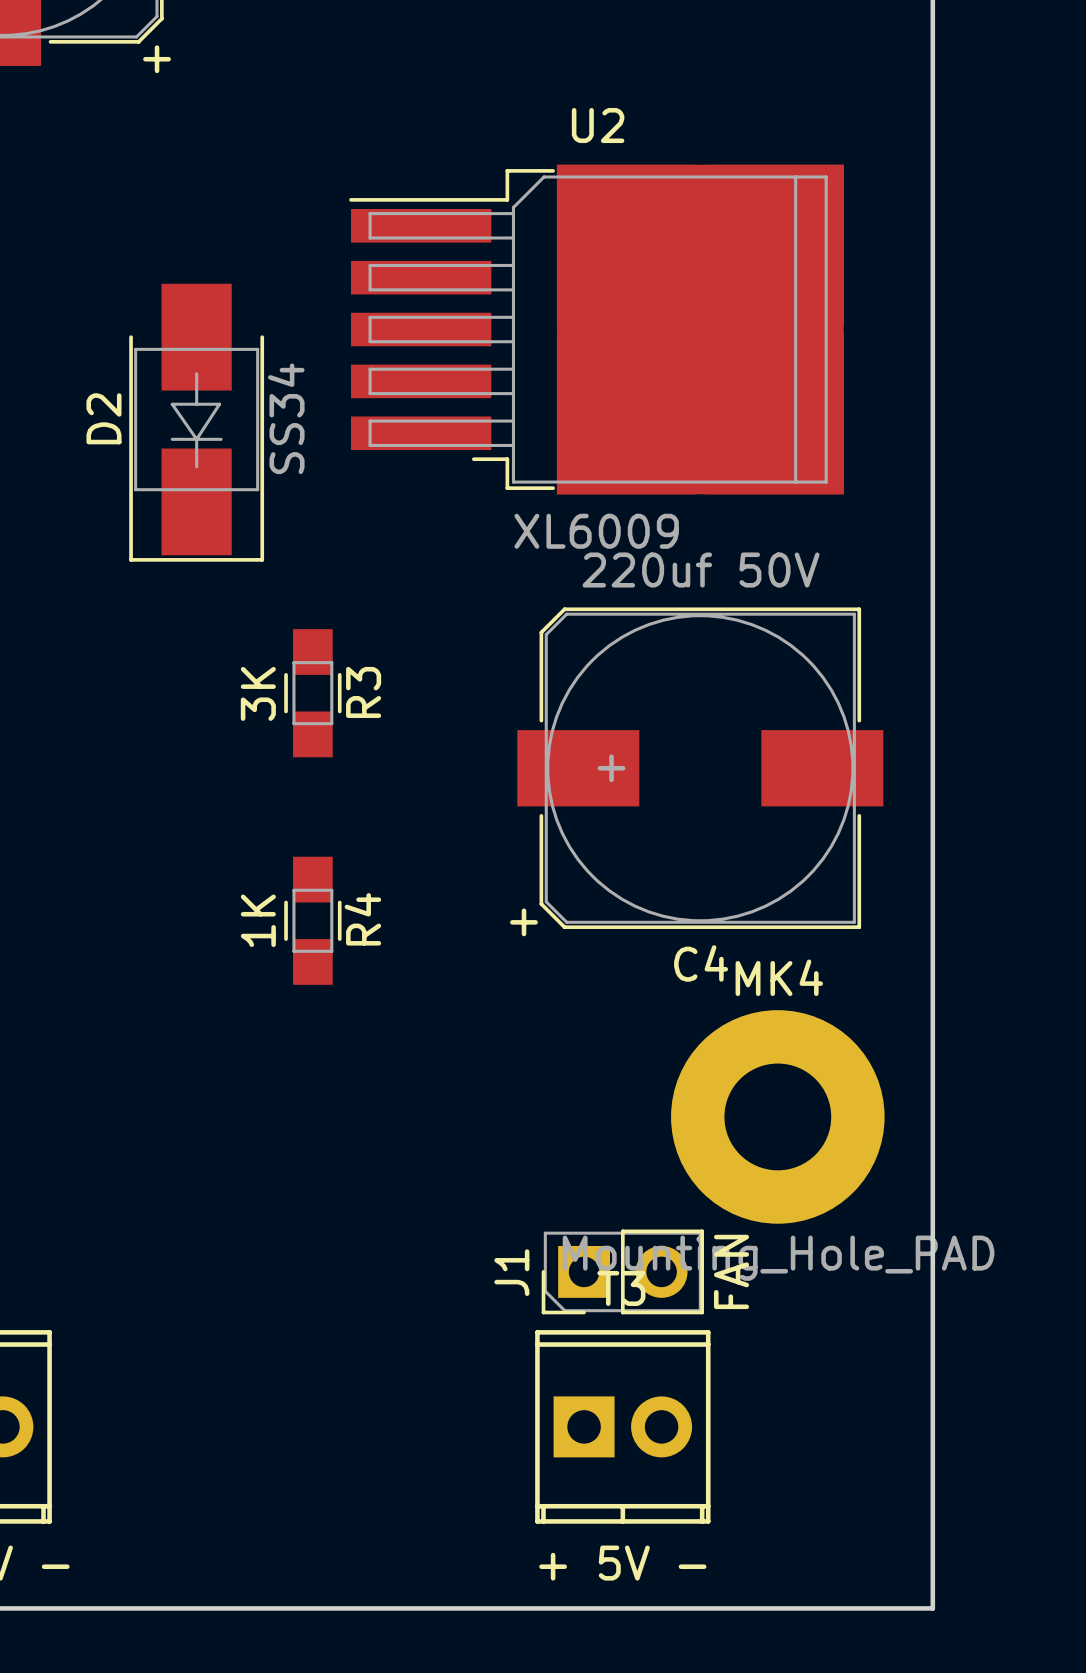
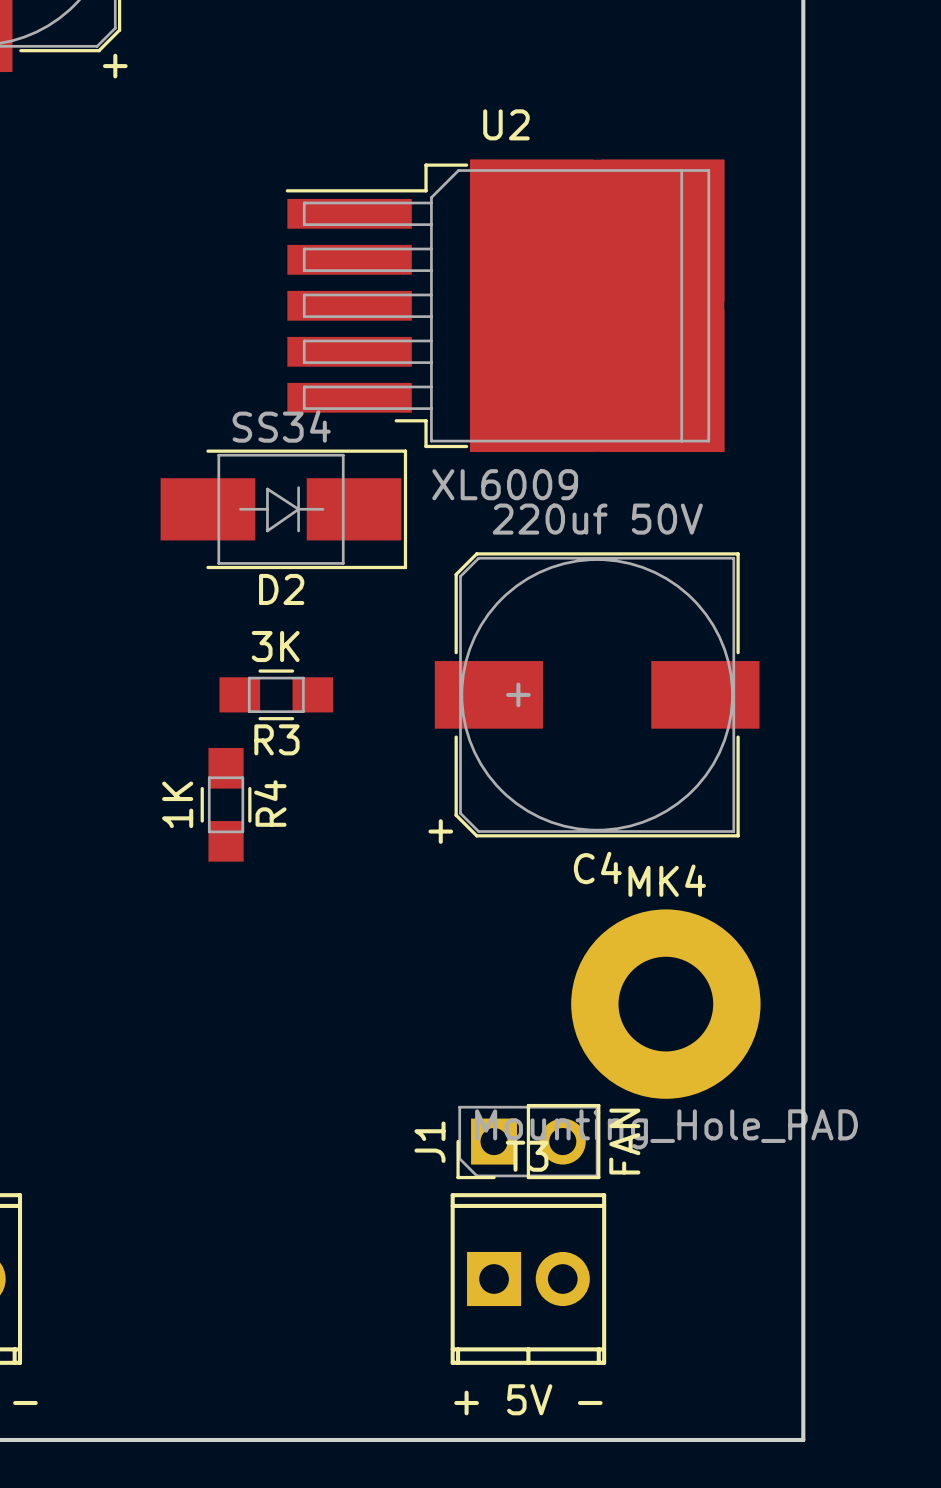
D2 rotation: 0° (196, 422) -> 90° counterclockwise (283, 509)
D2 position: (196, 422) -> (283, 509)
R3 rotation: 0° (312, 693) -> 90° clockwise (276, 694)
R3 position: (312, 693) -> (276, 694)
R4 position: (312, 920) -> (226, 804)

